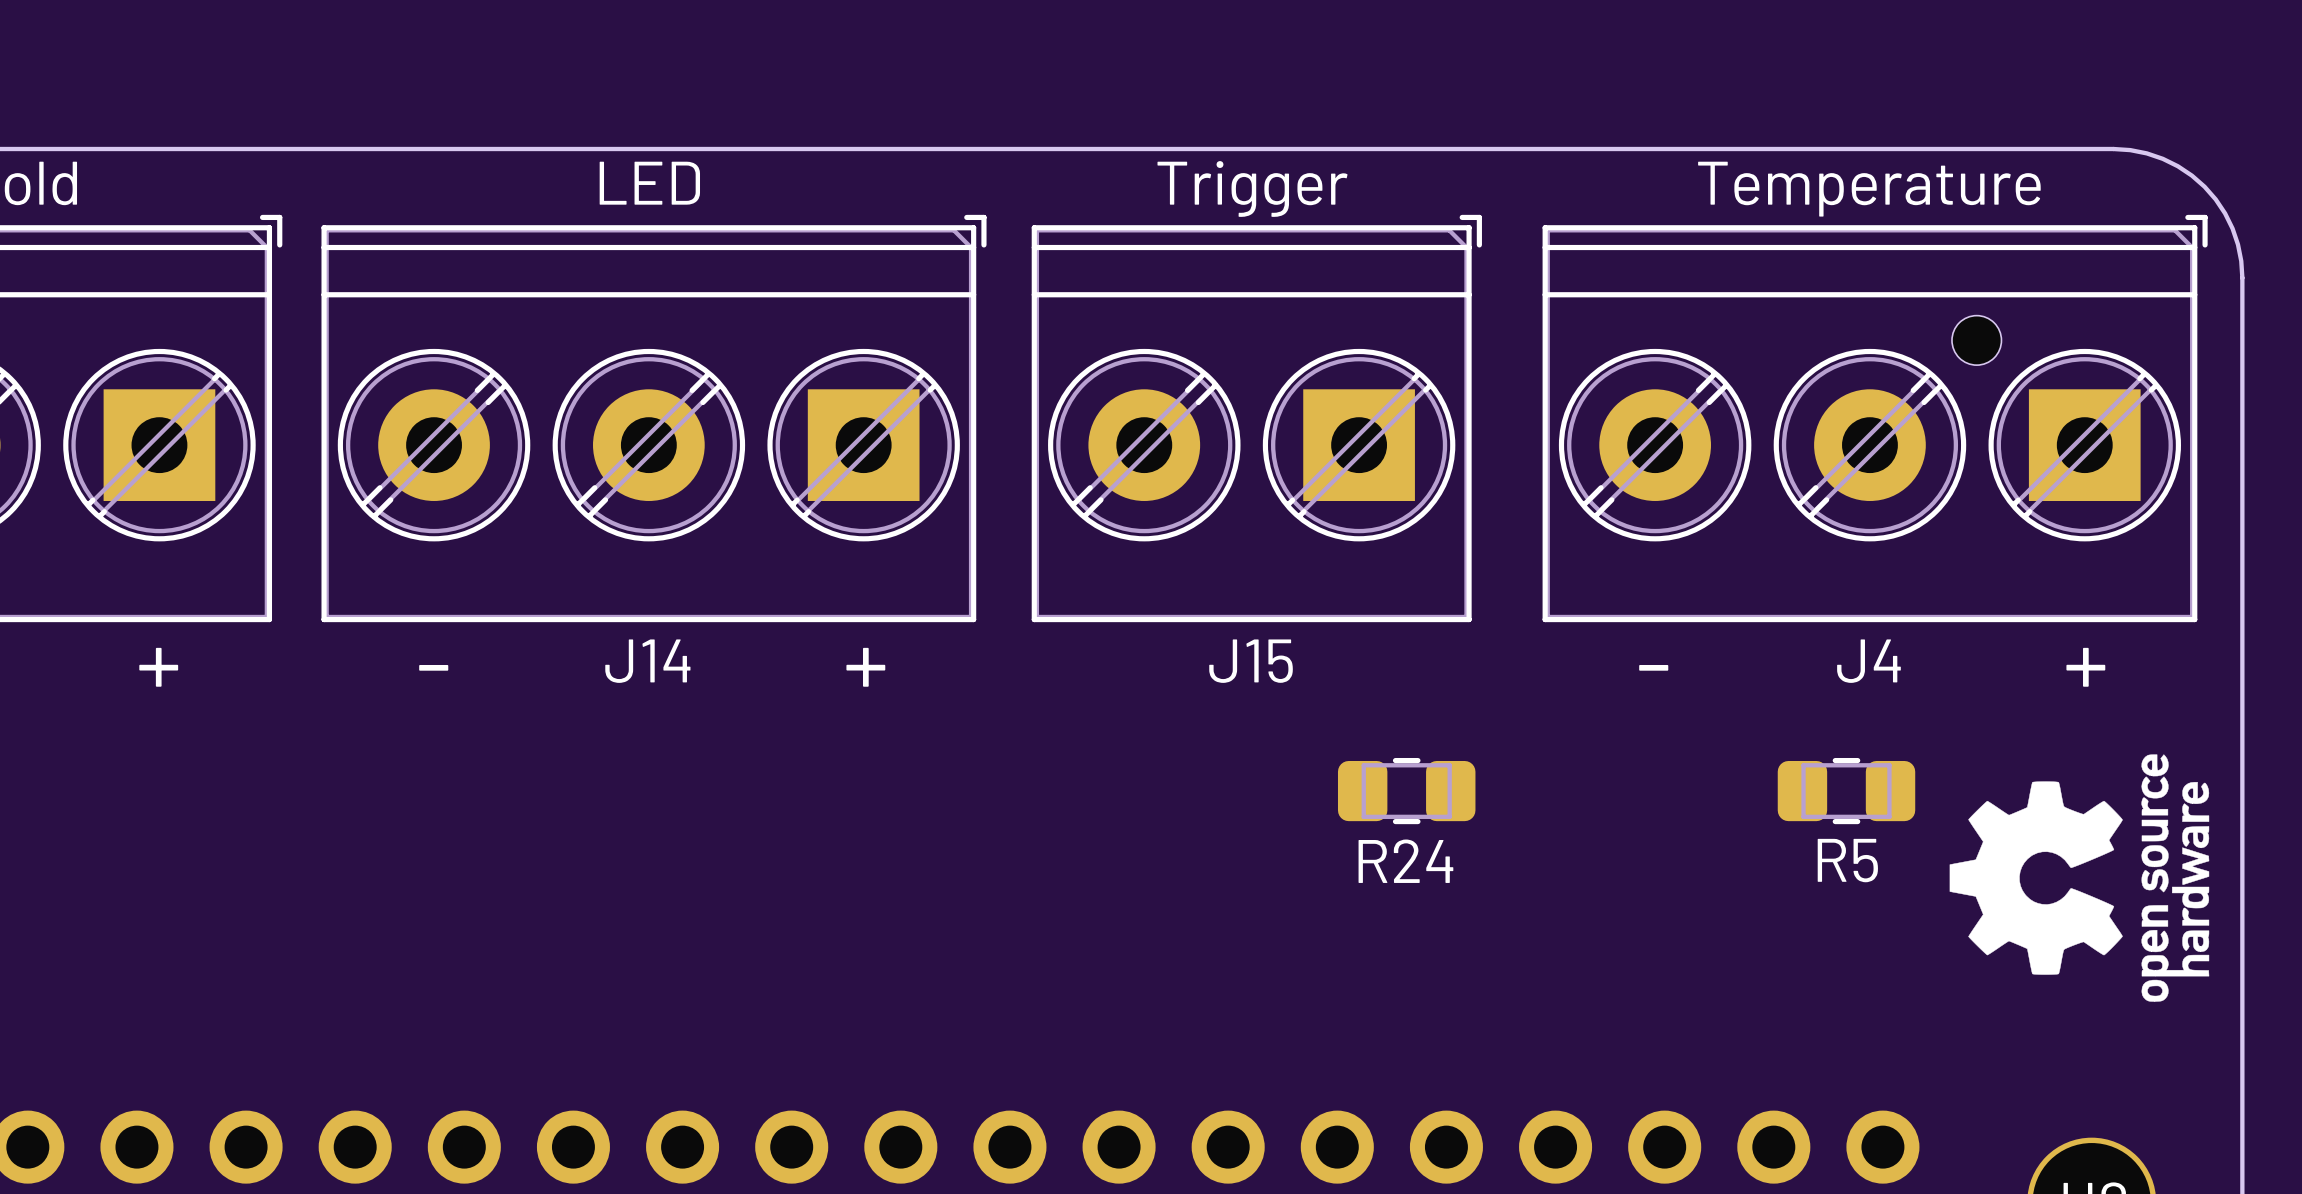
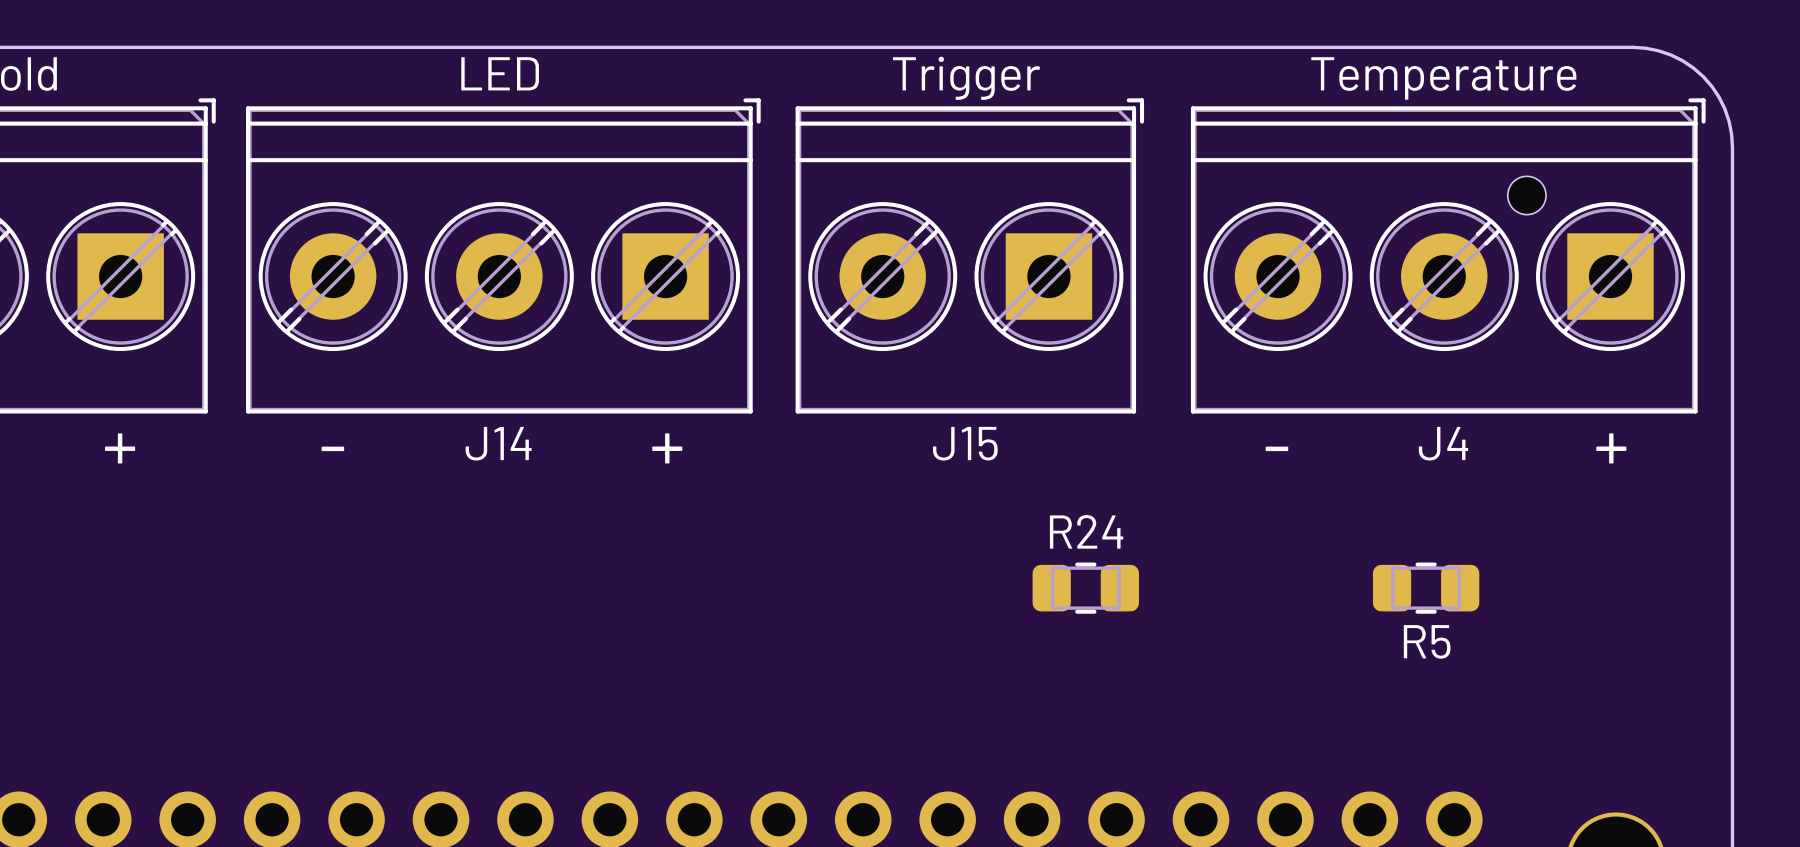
drawing: [1949, 754, 2210, 1002] -> none
R24 position: (1406, 791) -> (1085, 588)
R5 position: (1846, 791) -> (1426, 588)
R24 name position: R24 (1405, 861) -> R24 (1086, 531)

